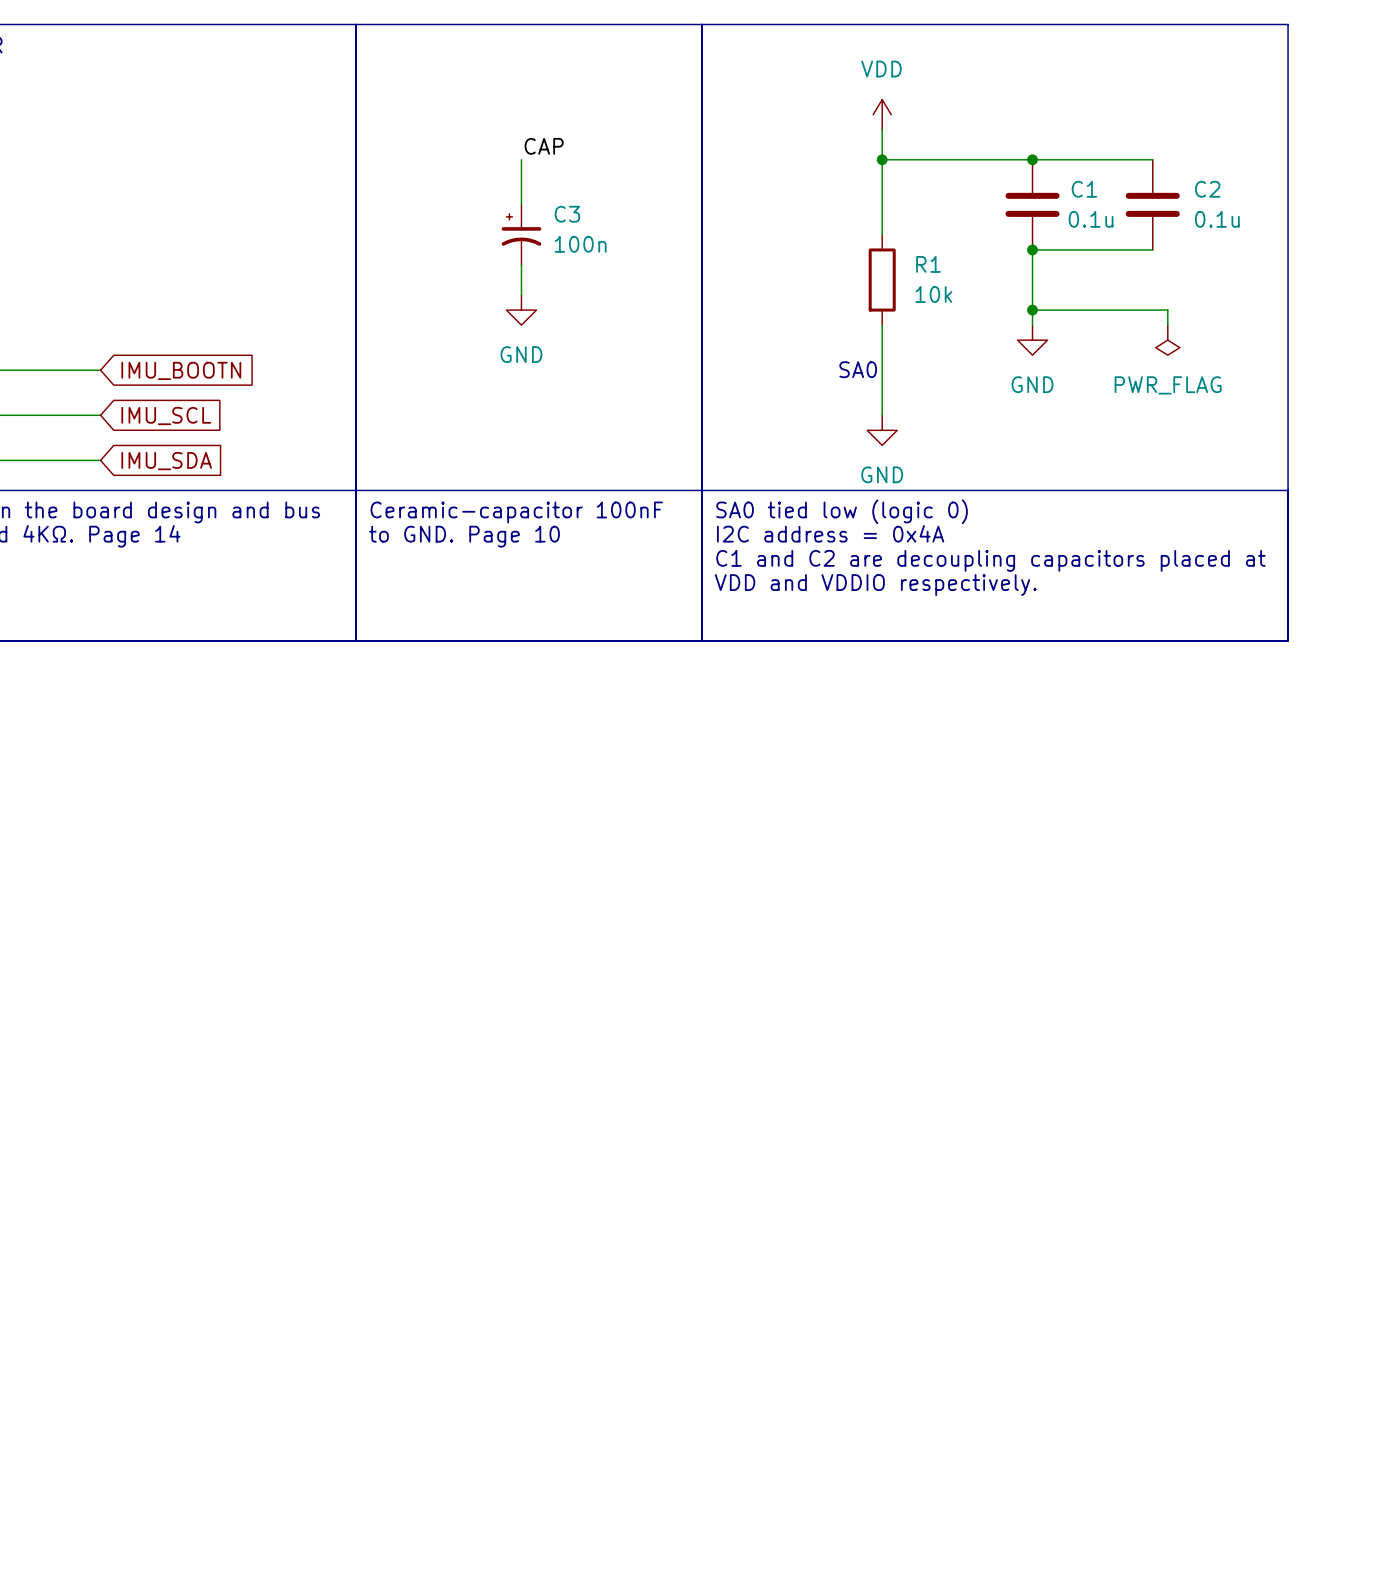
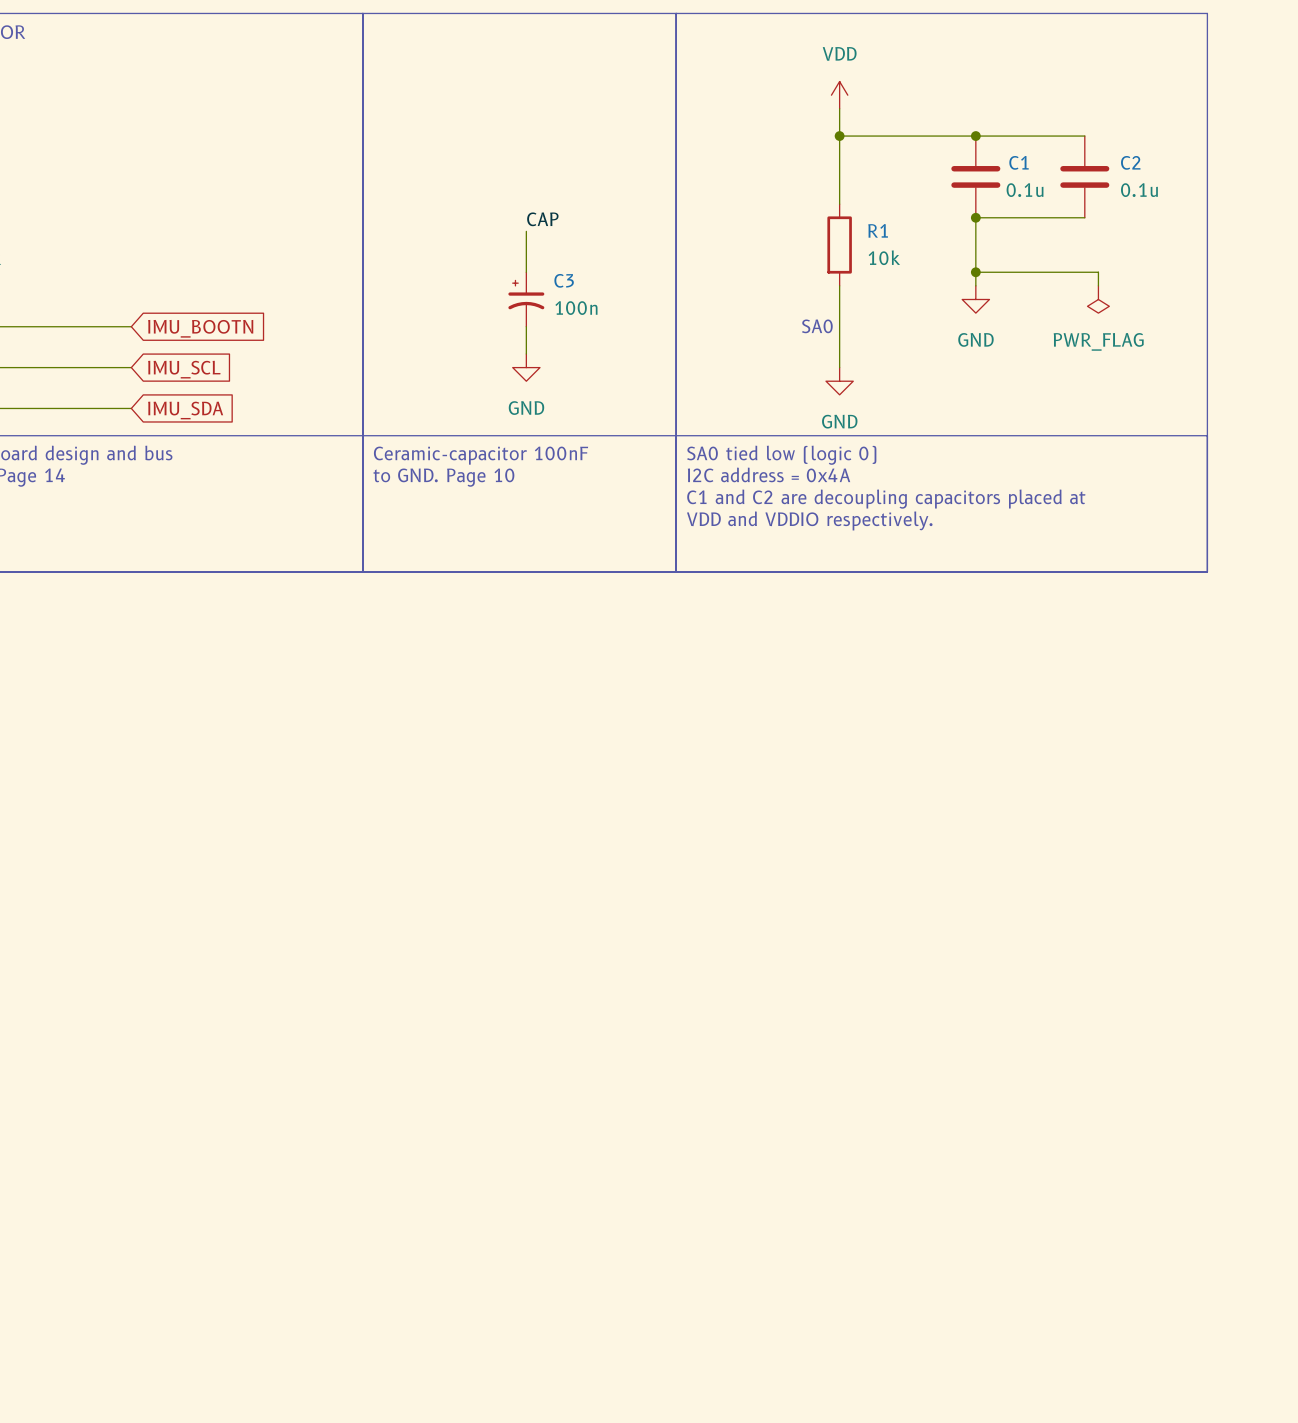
label position: CAP (544, 146) -> CAP (542, 219)
wire: (521, 159) (521, 204) -> (526, 231) (526, 272)
C3 position: (521, 234) -> (526, 299)
wire: (521, 264) (521, 295) -> (526, 326) (526, 353)
power symbol position: GND (521, 310) -> GND (526, 367)

